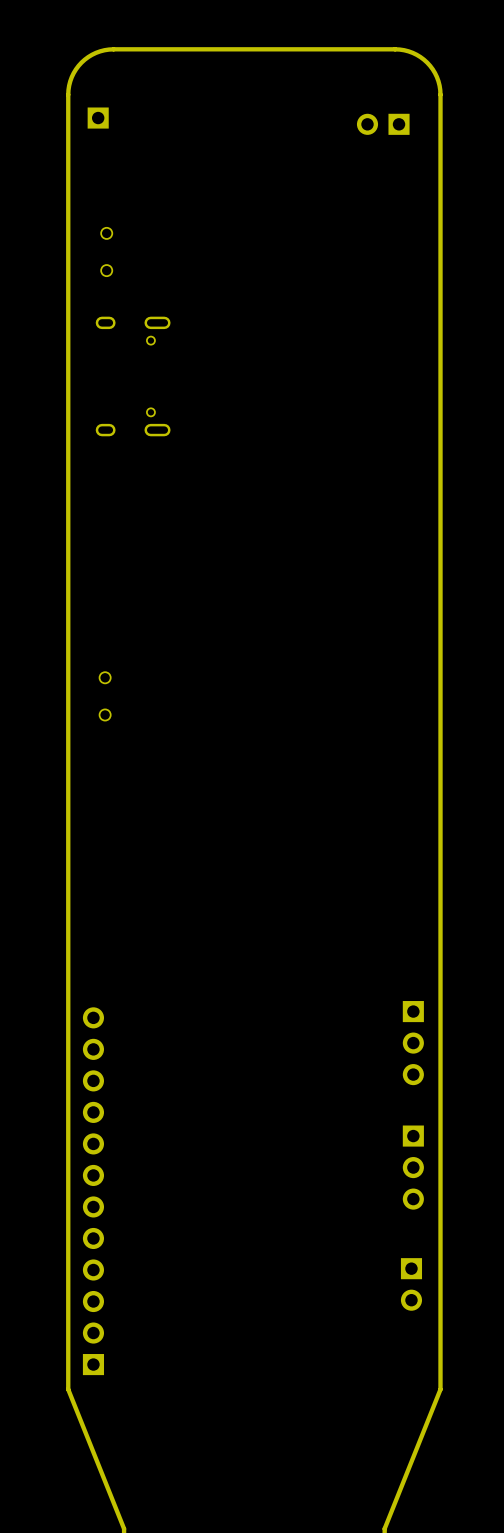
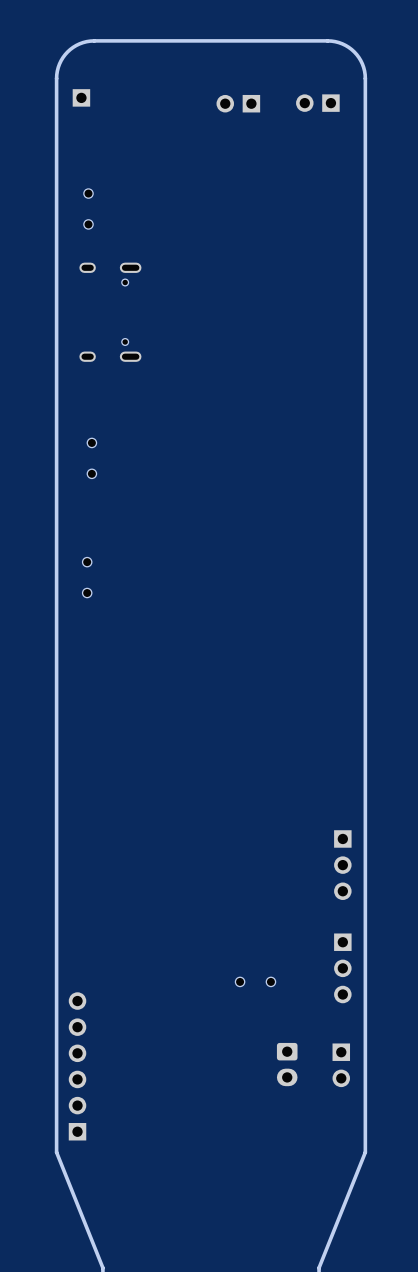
part: none -> (238, 103)
part: none -> (91, 458)
part: none -> (255, 981)
part: (93, 1191) -> none
part: none -> (287, 1064)

